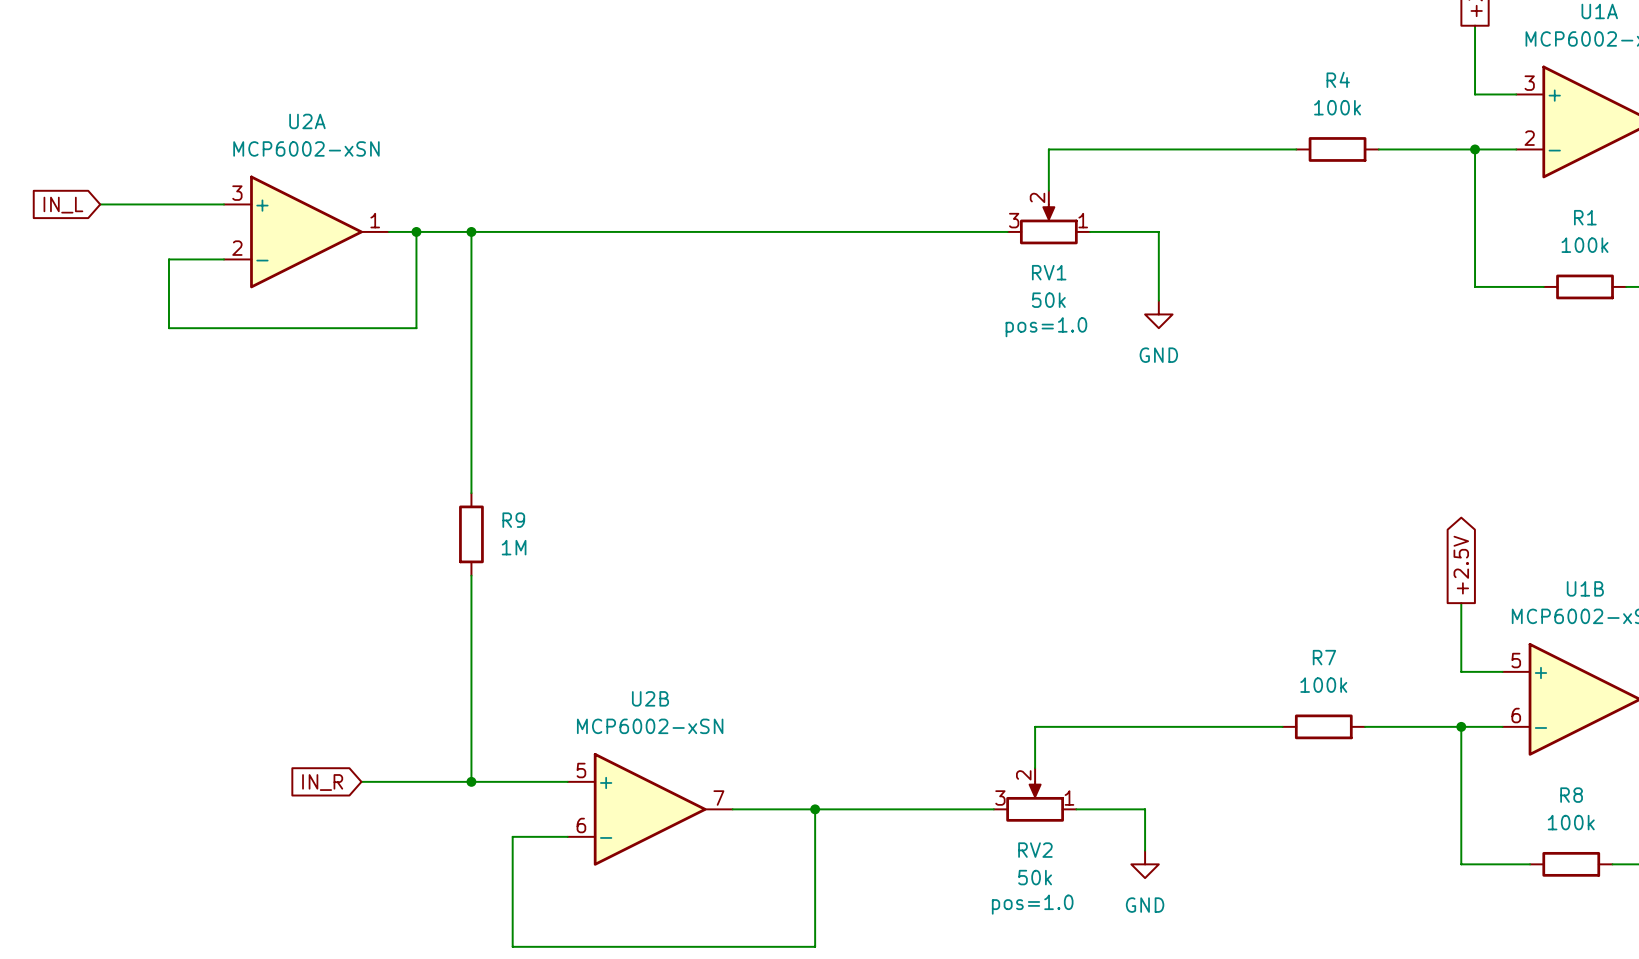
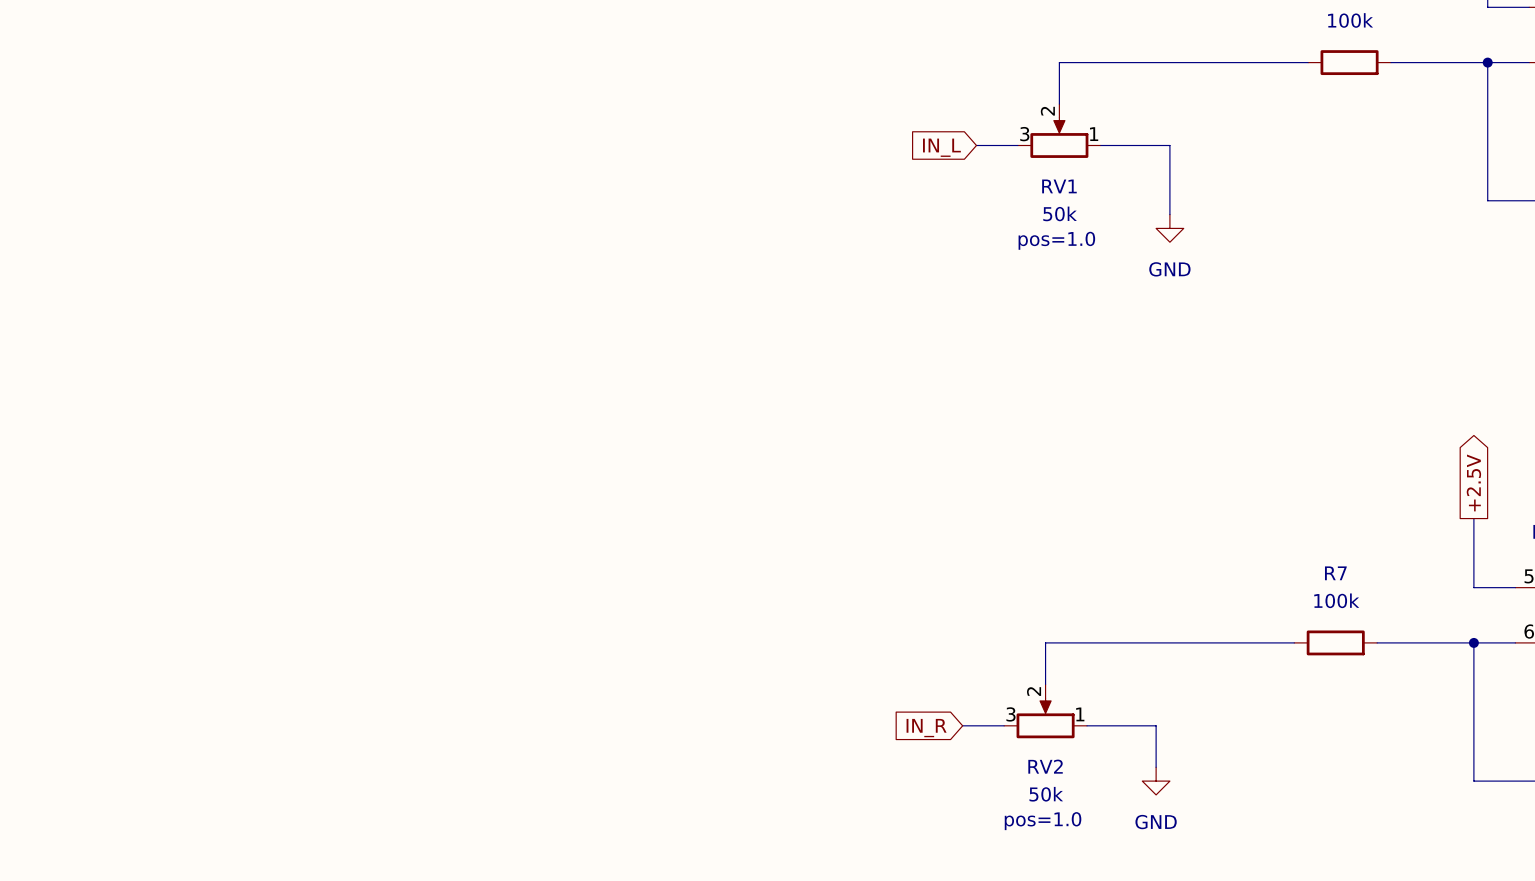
wire: (100, 204) (223, 204) -> none
global label: IN_L (63, 205) -> none
U2A: MCP6002-xSN (306, 231) -> none
wire: (388, 231) (966, 231) -> none
wire: (416, 231) (416, 328) (168, 328) (168, 259) (223, 259) -> none
junction: (416, 231) -> none
wire: (471, 231) (471, 493) -> none
junction: (471, 231) -> none
global label: none -> IN_L (941, 147)
R9: 1M (471, 534) -> none
wire: (471, 575) (471, 781) -> none
wire: (361, 781) (567, 781) -> none
junction: (471, 781) -> none
global label: IN_R (322, 782) -> none
U2B: MCP6002-xSN (650, 809) -> none
wire: (732, 809) (952, 809) -> none
wire: (815, 809) (815, 946) (512, 946) (512, 836) (567, 836) -> none
junction: (815, 809) -> none
global label: none -> IN_R (926, 728)

